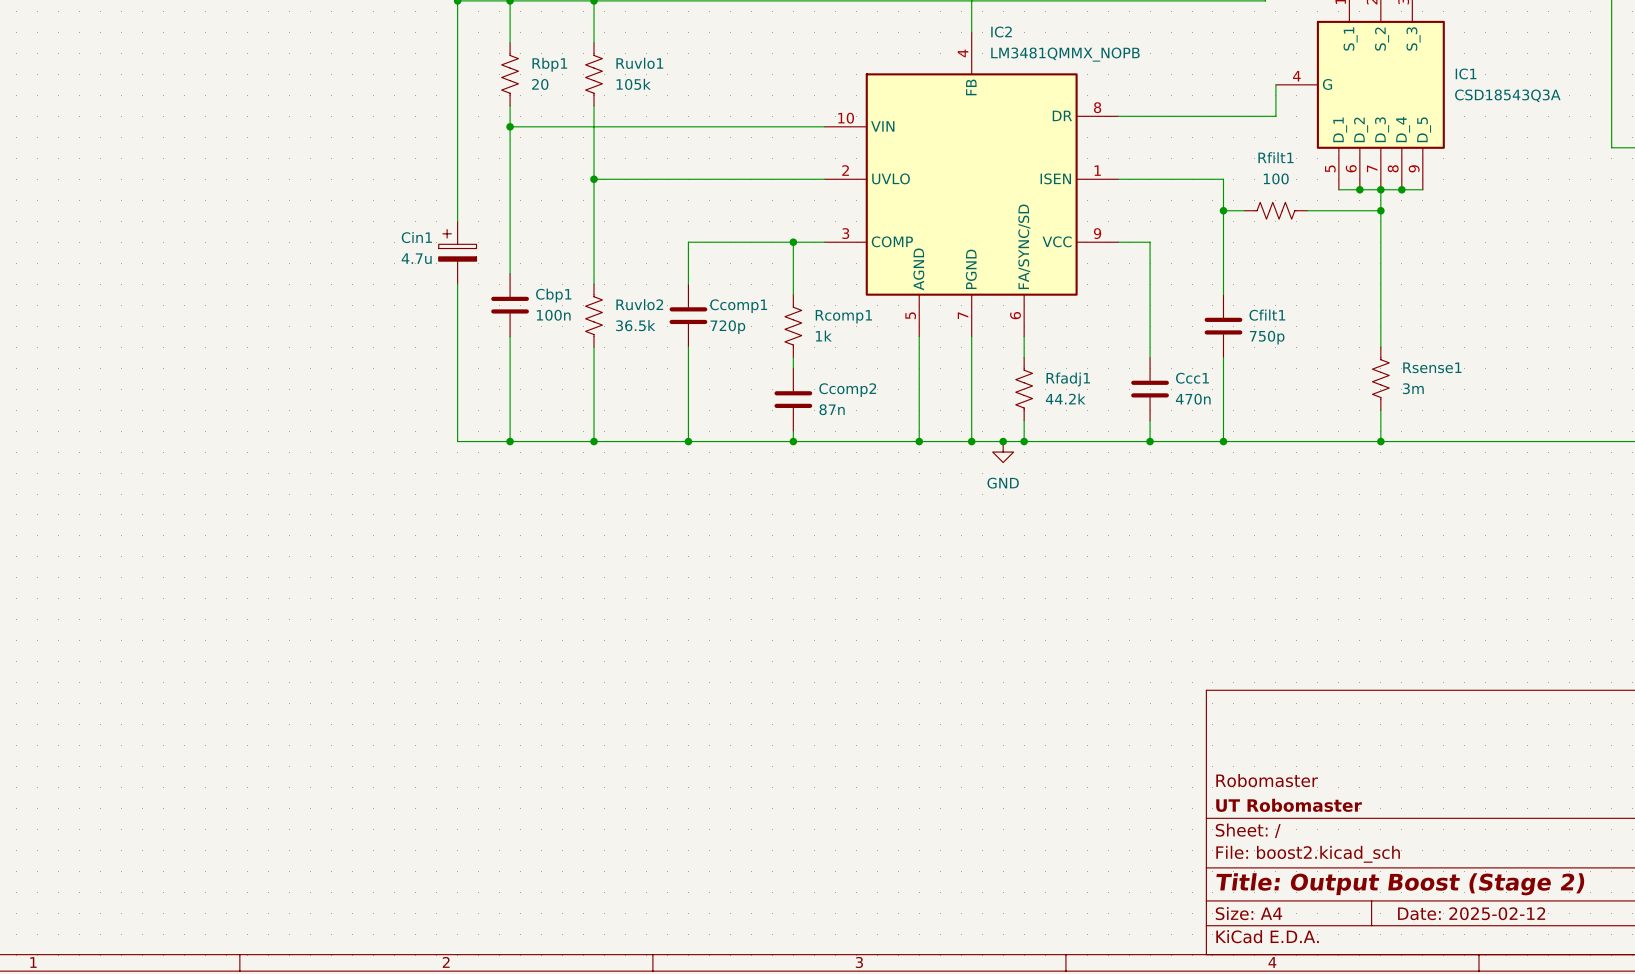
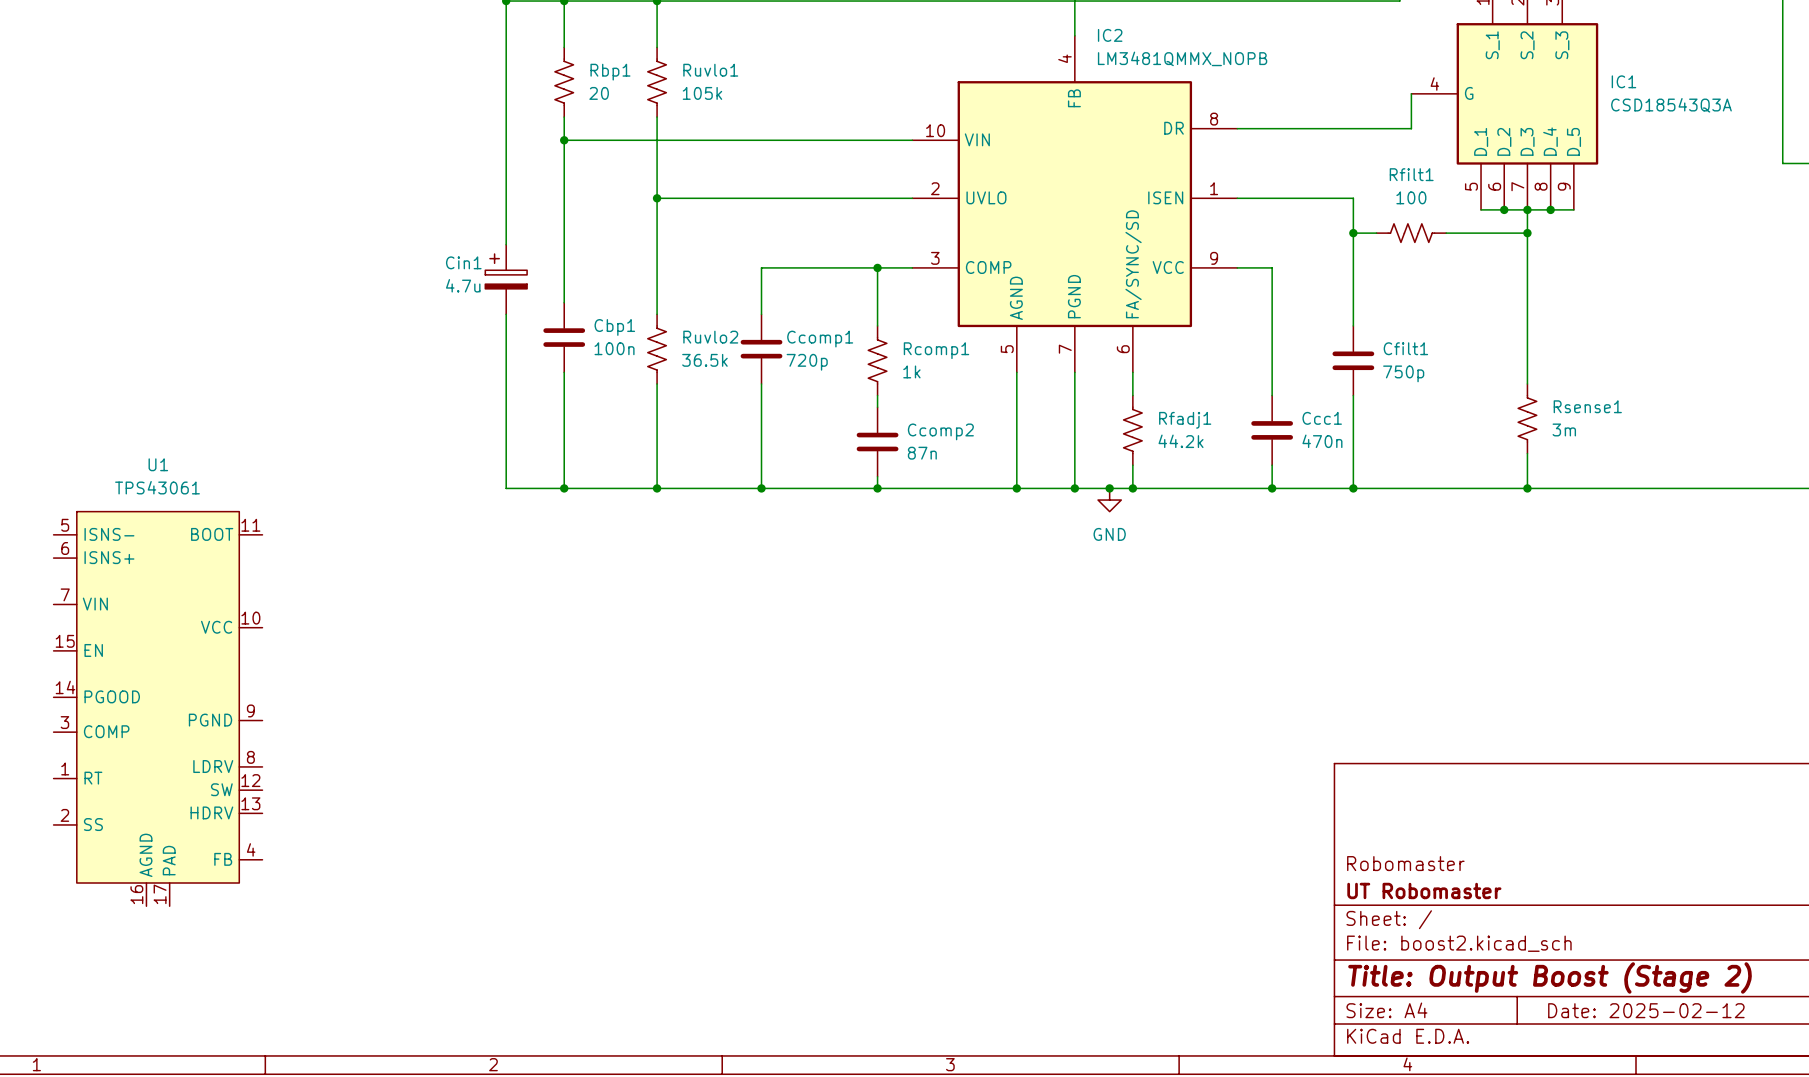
U1: none -> TPS43061 (158, 708)

